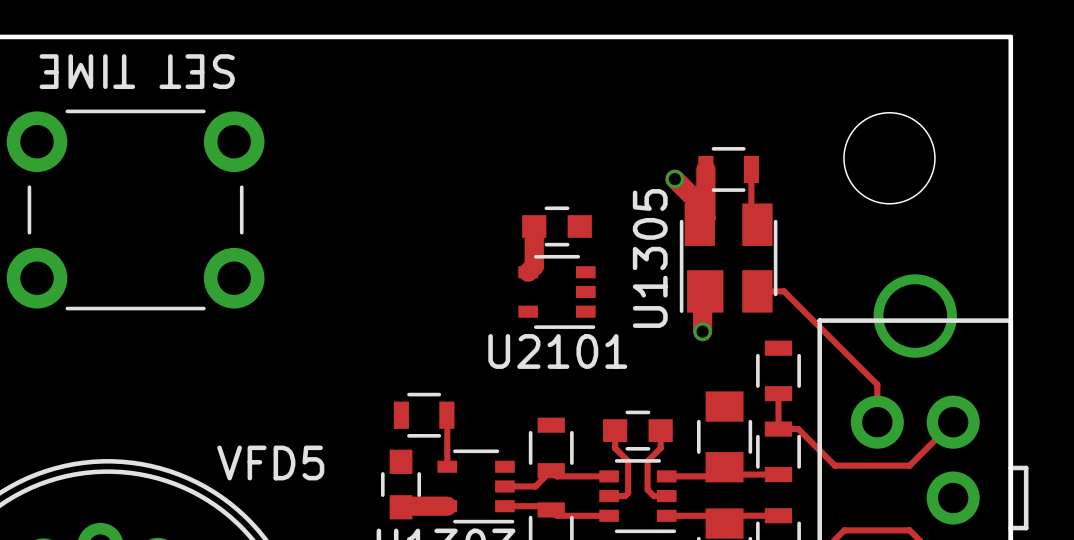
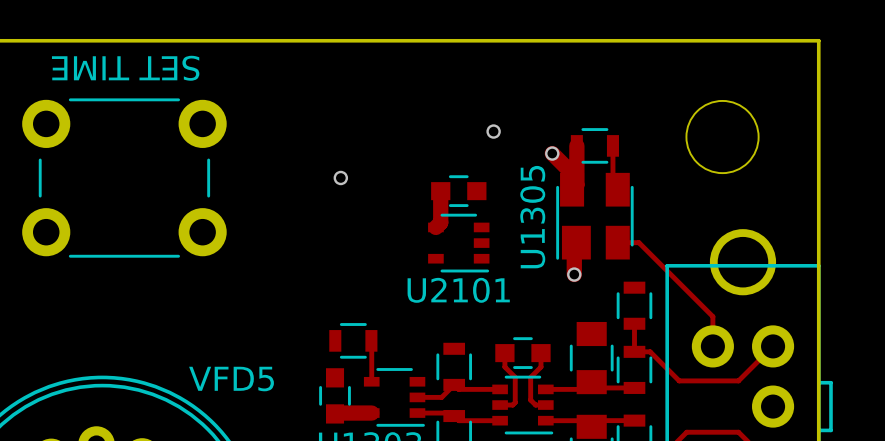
via: none -> (493, 131)
via: none -> (340, 177)

